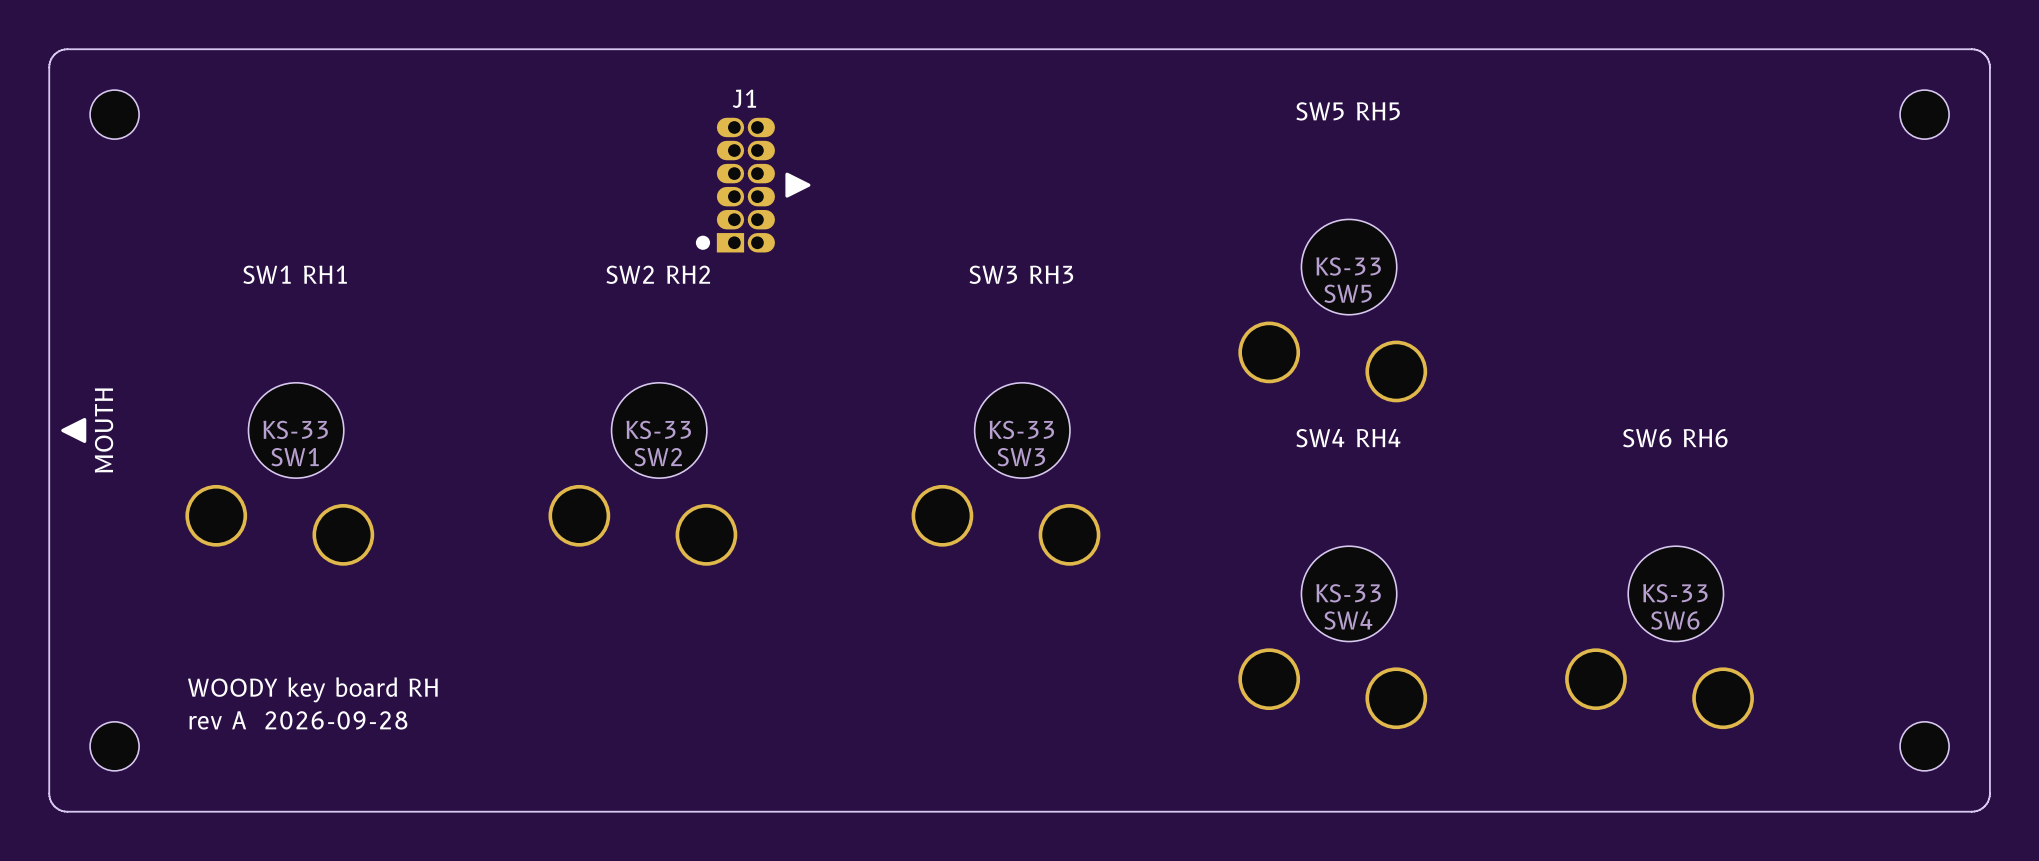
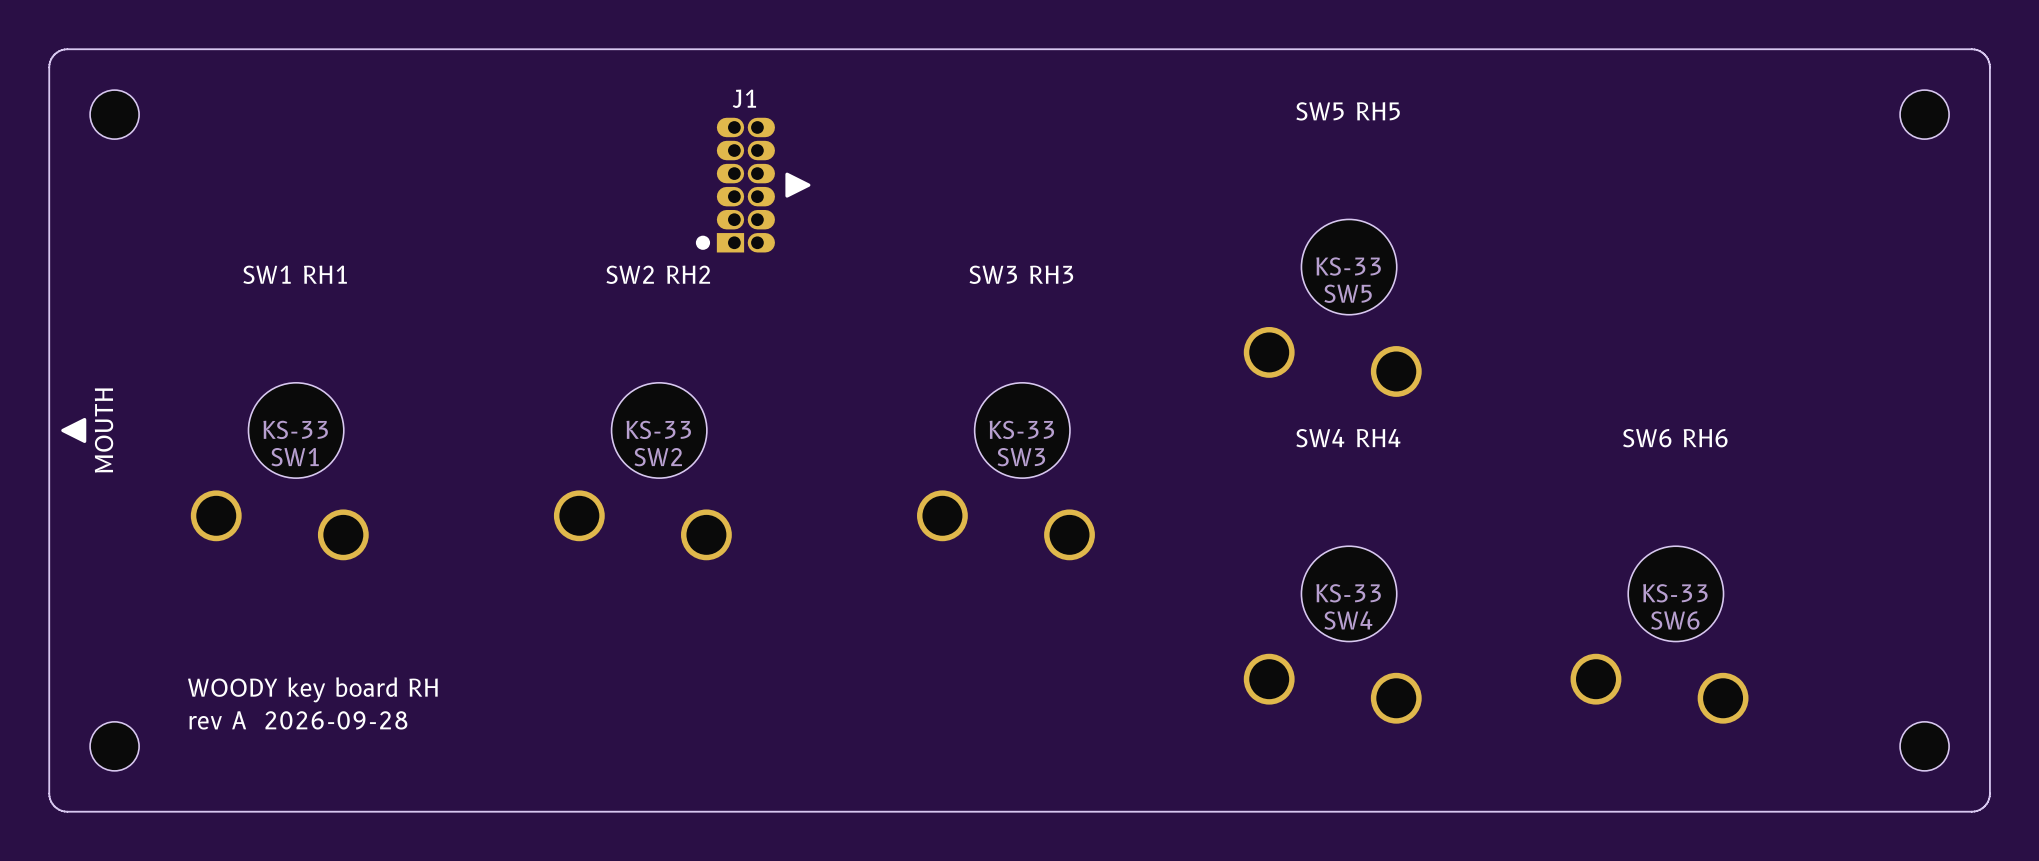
SW5 footprint: [1238, 219, 1428, 403] -> [1243, 219, 1422, 397]
SW1 footprint: [185, 382, 375, 566] -> [190, 382, 369, 561]
SW2 footprint: [548, 382, 738, 566] -> [553, 382, 732, 561]
SW3 footprint: [911, 382, 1101, 566] -> [917, 382, 1095, 561]
SW4 footprint: [1238, 546, 1428, 730] -> [1243, 546, 1422, 724]
SW6 footprint: [1565, 546, 1754, 730] -> [1570, 546, 1749, 724]

